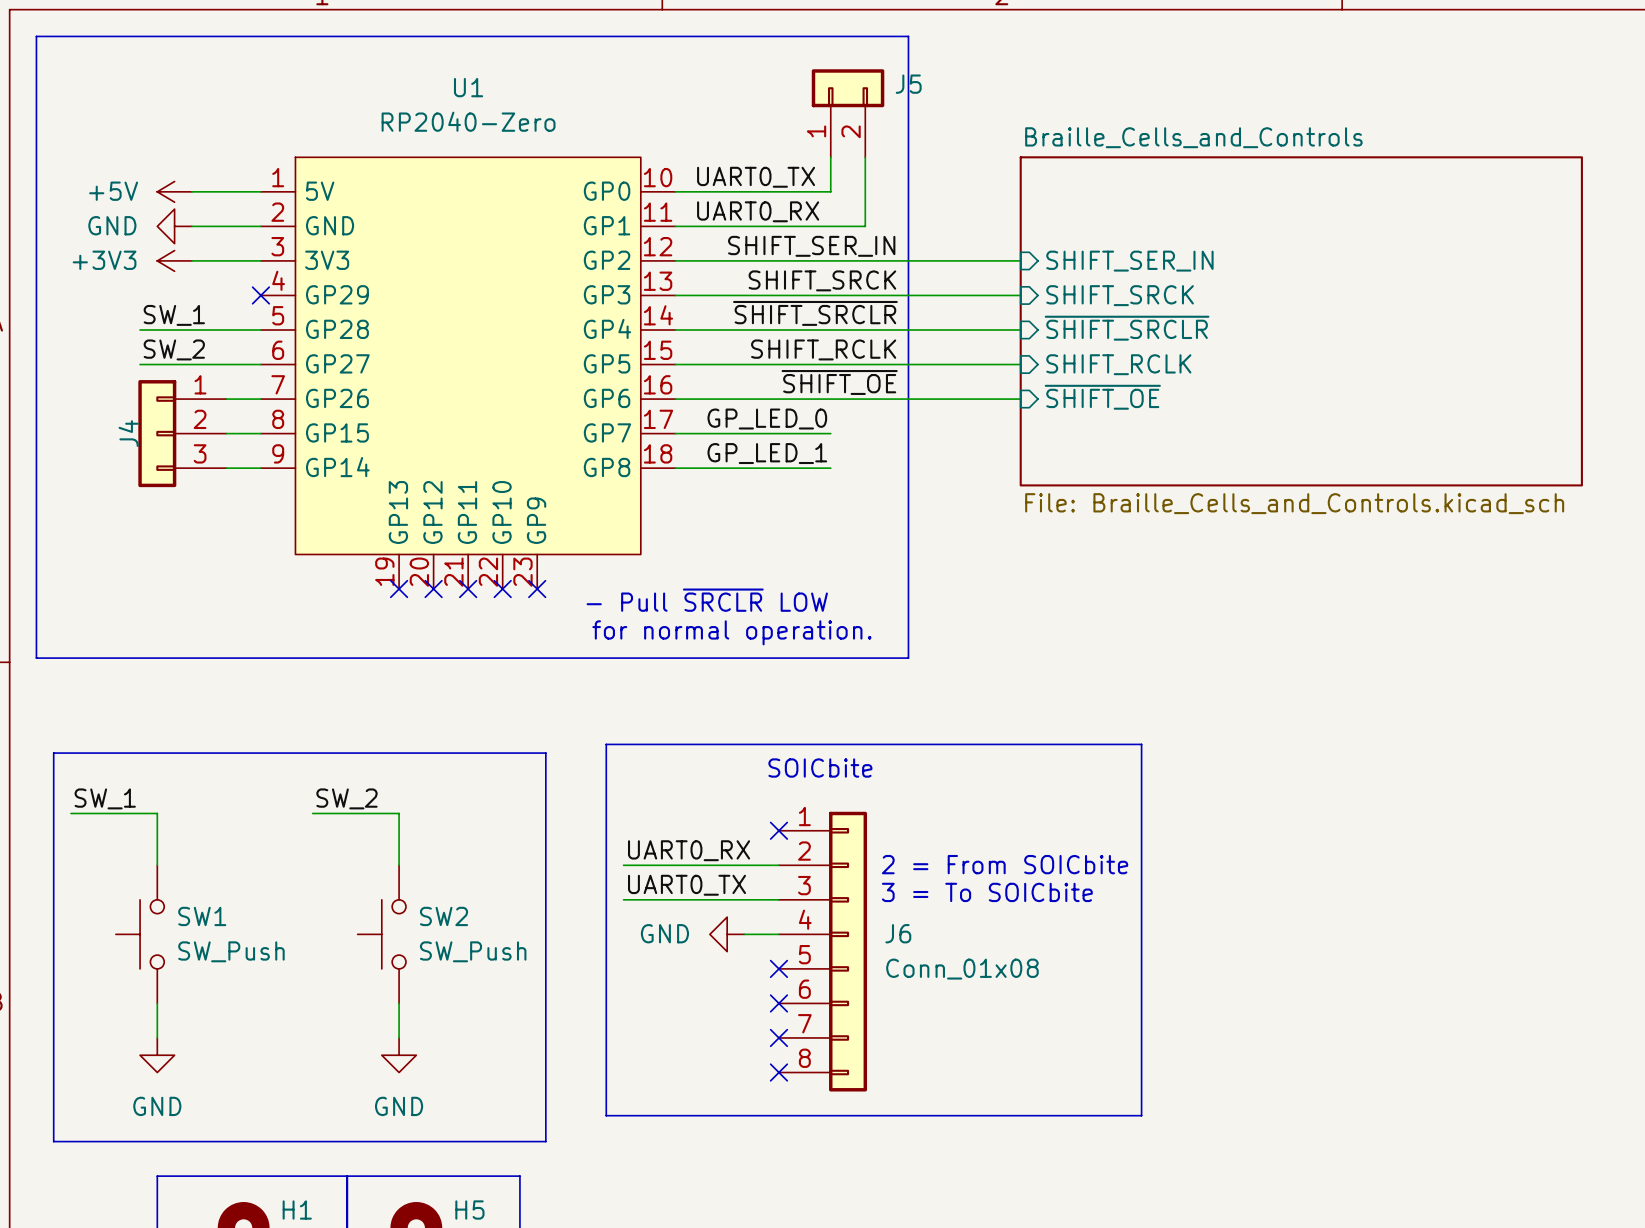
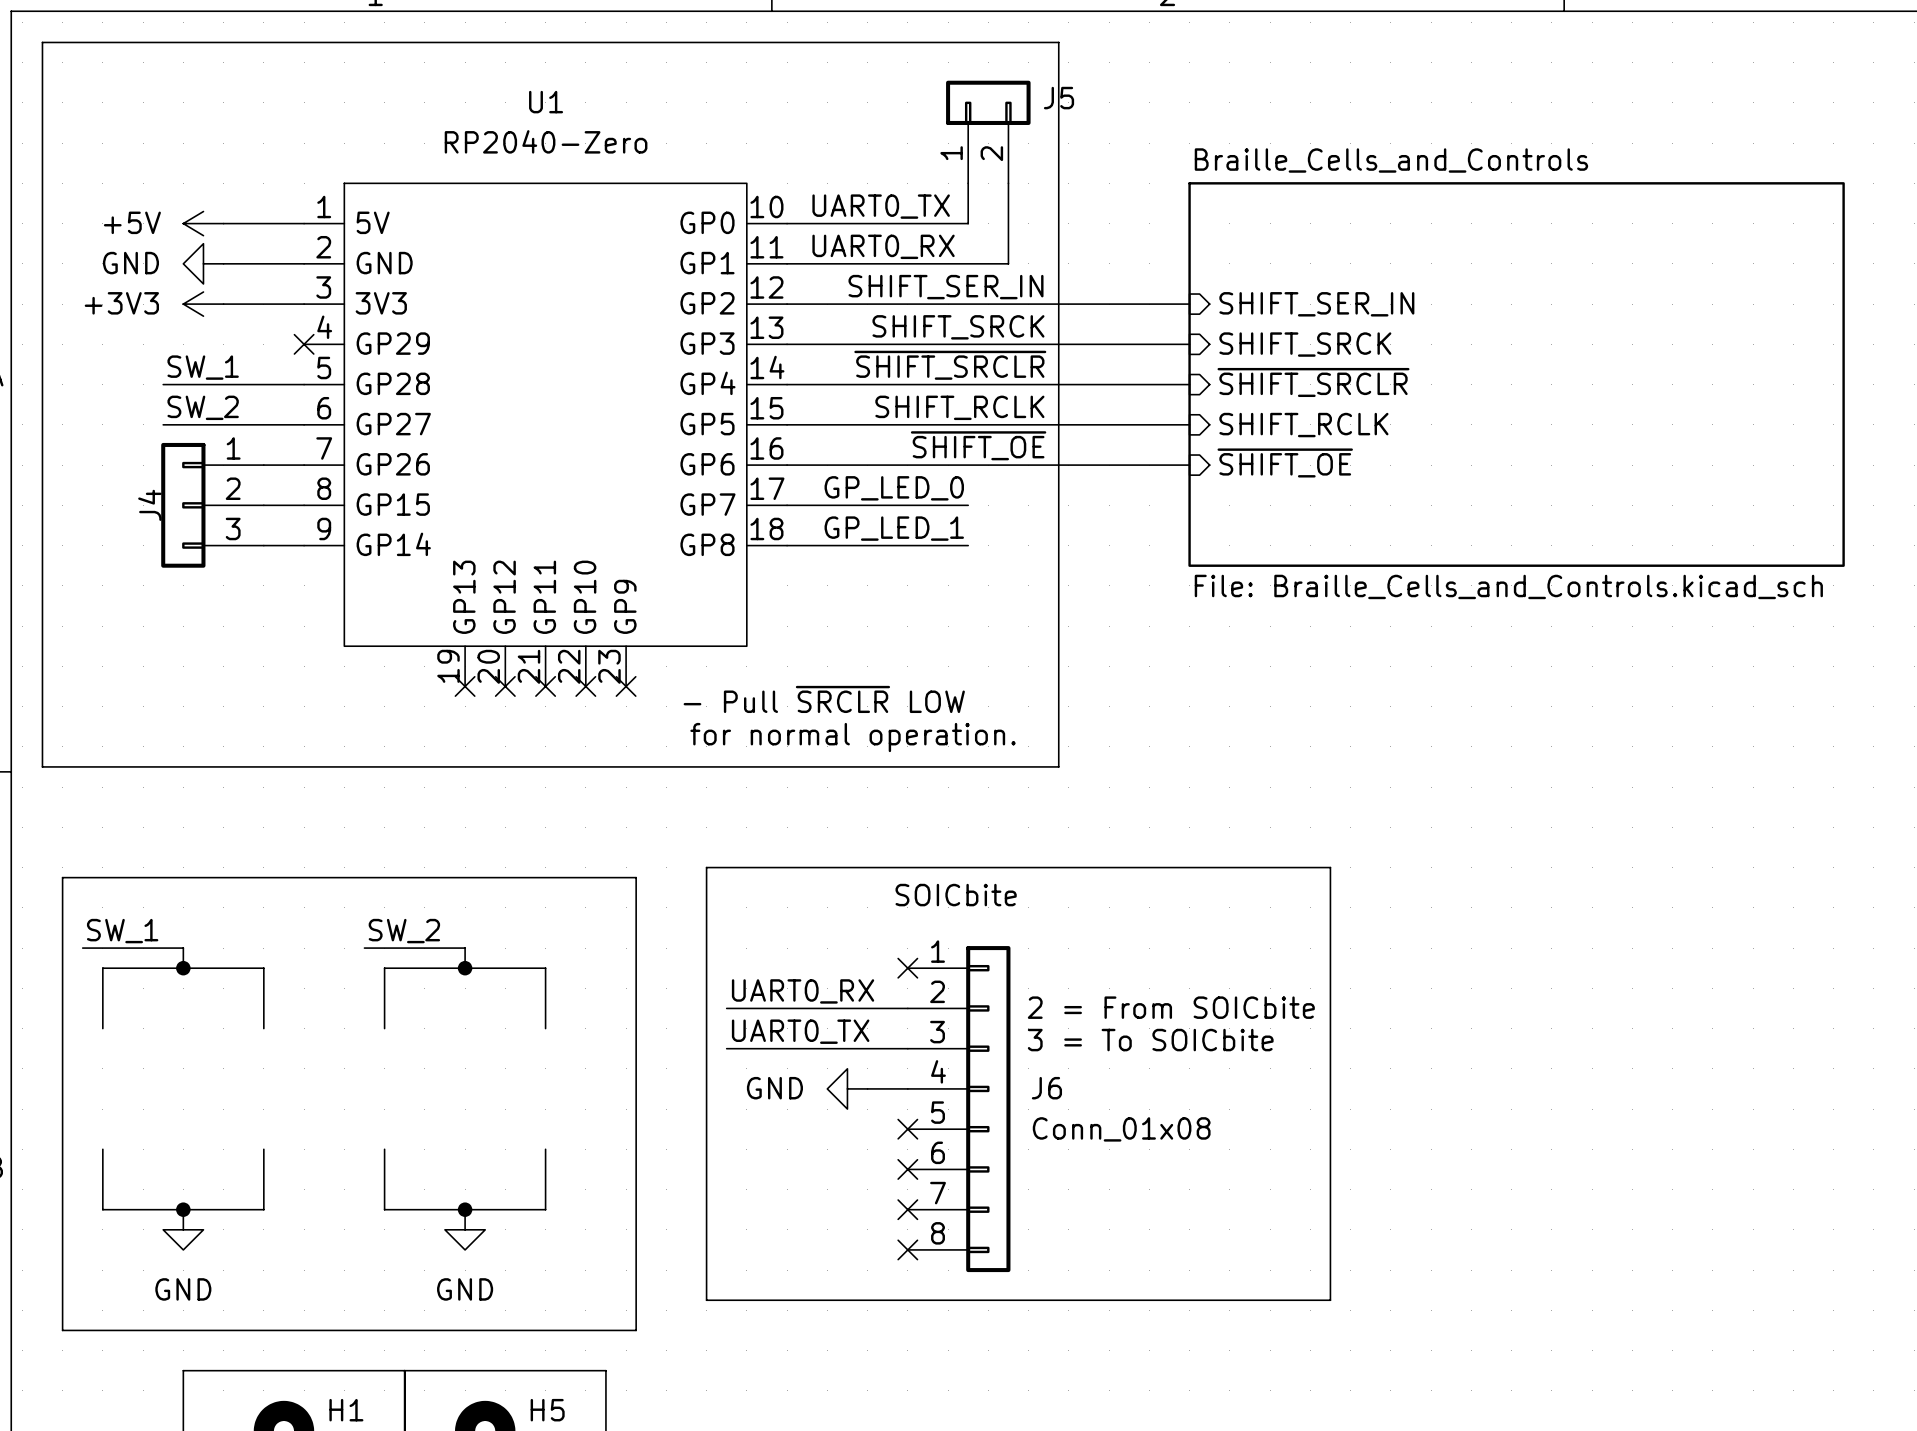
wire: (157, 830) (157, 865) -> none
junction: none -> (183, 968)
wire: (399, 830) (399, 865) -> none
junction: none -> (465, 968)
wire: none -> (102, 1028) (102, 968) (263, 968) (263, 1028)
wire: none -> (384, 1028) (384, 968) (545, 968) (545, 1028)
SW1: SW_Push (140, 934) -> none
SW2: SW_Push (381, 934) -> none
wire: none -> (102, 1149) (102, 1209) (263, 1209) (263, 1149)
wire: none -> (384, 1149) (384, 1209) (545, 1209) (545, 1149)
wire: (157, 1003) (157, 1037) -> none
wire: (399, 1003) (399, 1037) -> none
junction: none -> (183, 1209)
junction: none -> (465, 1209)

